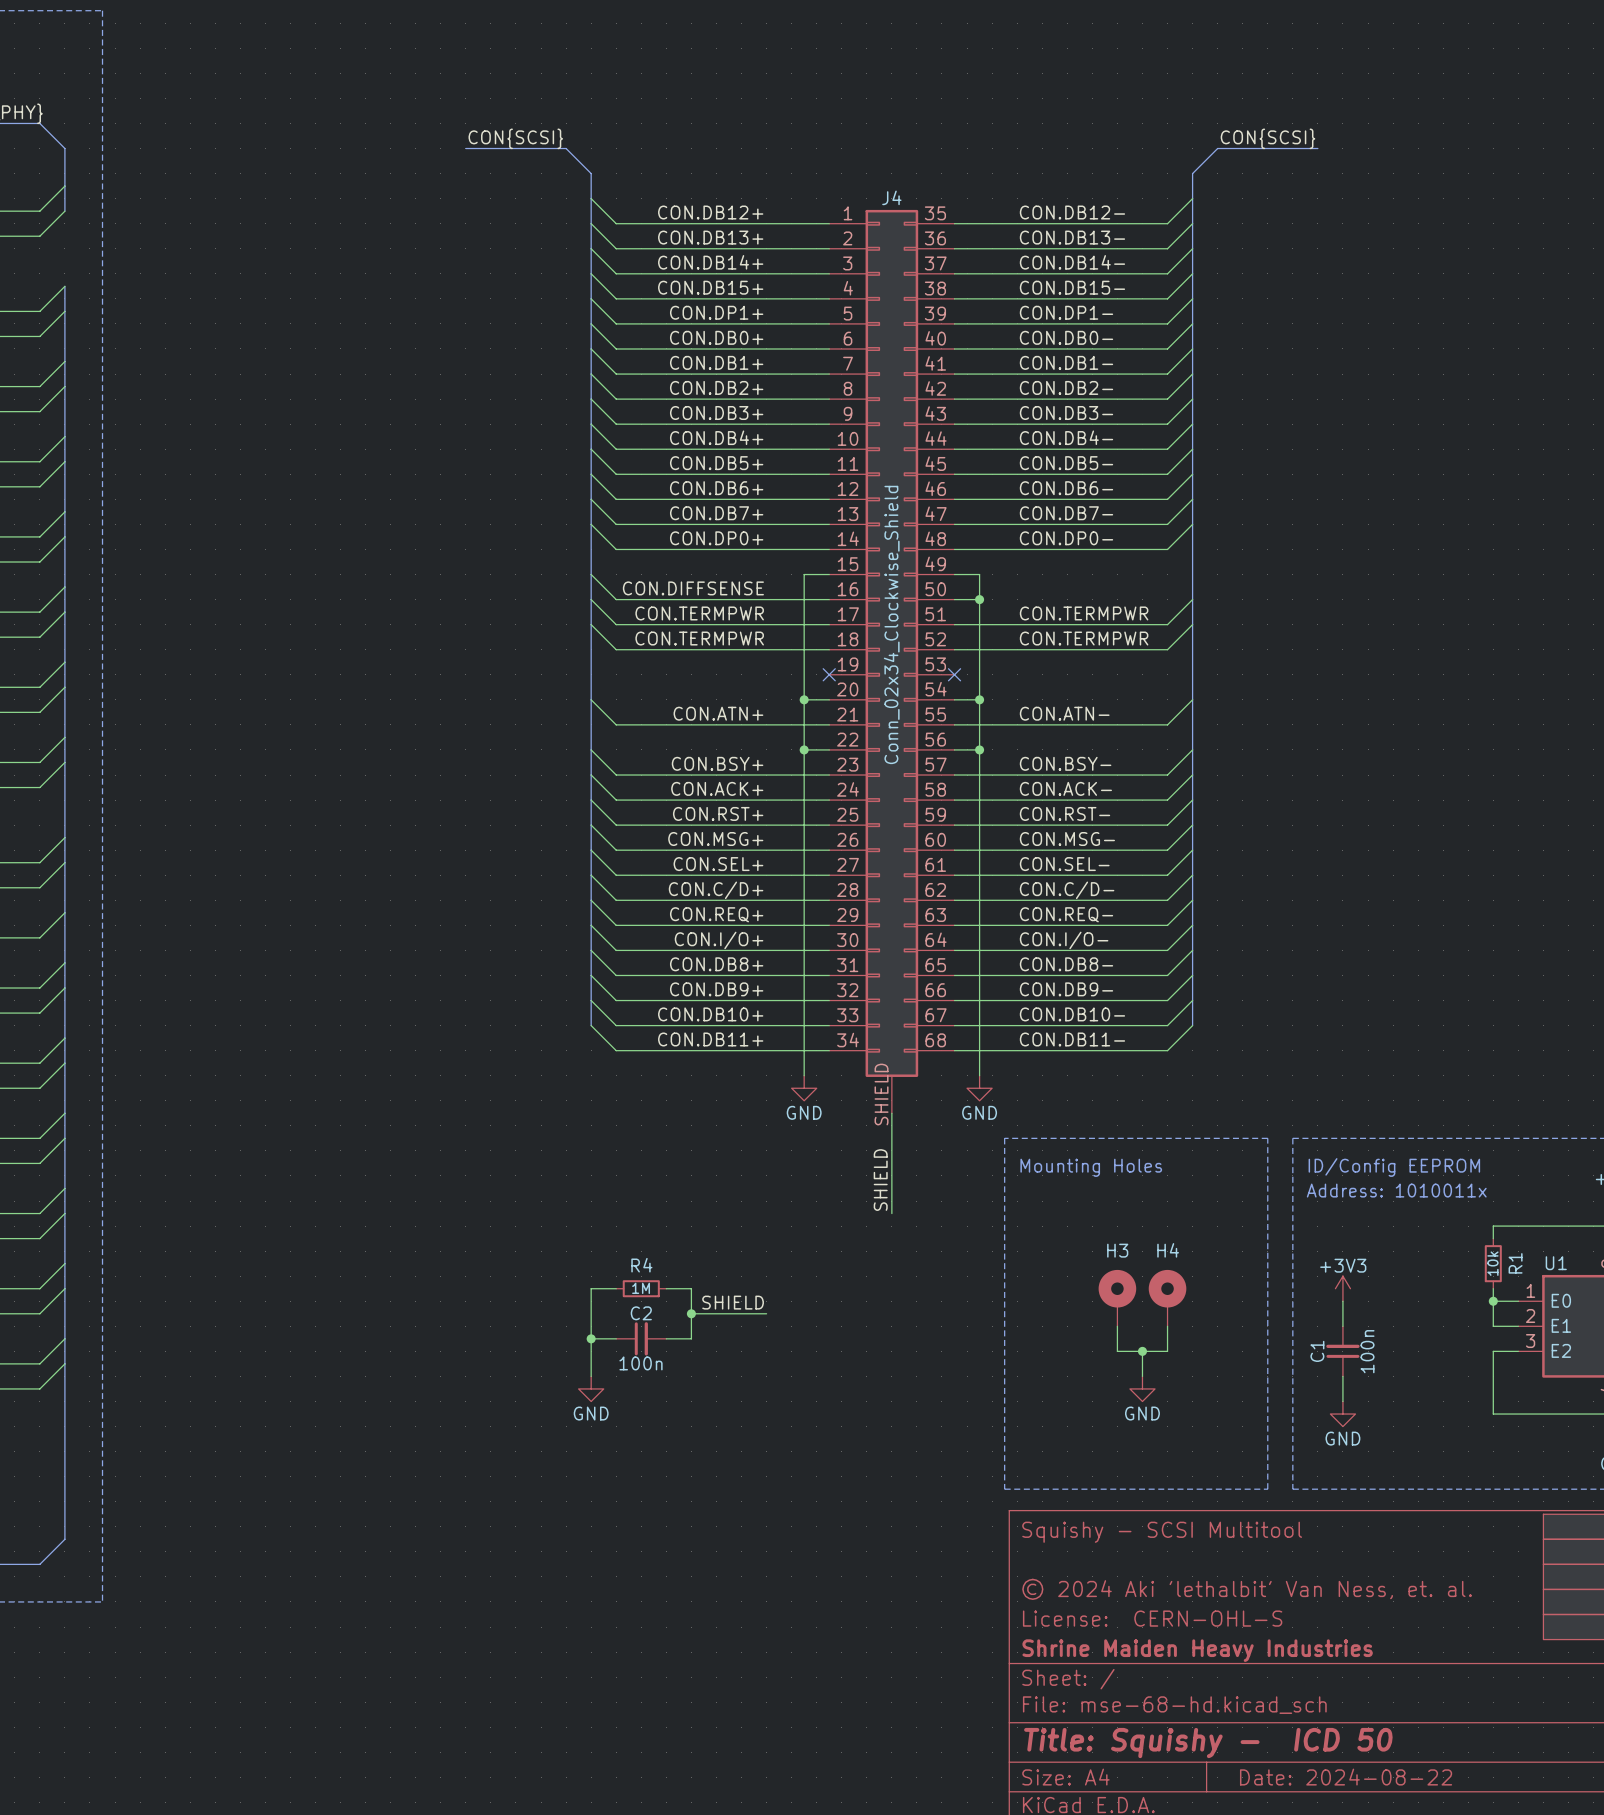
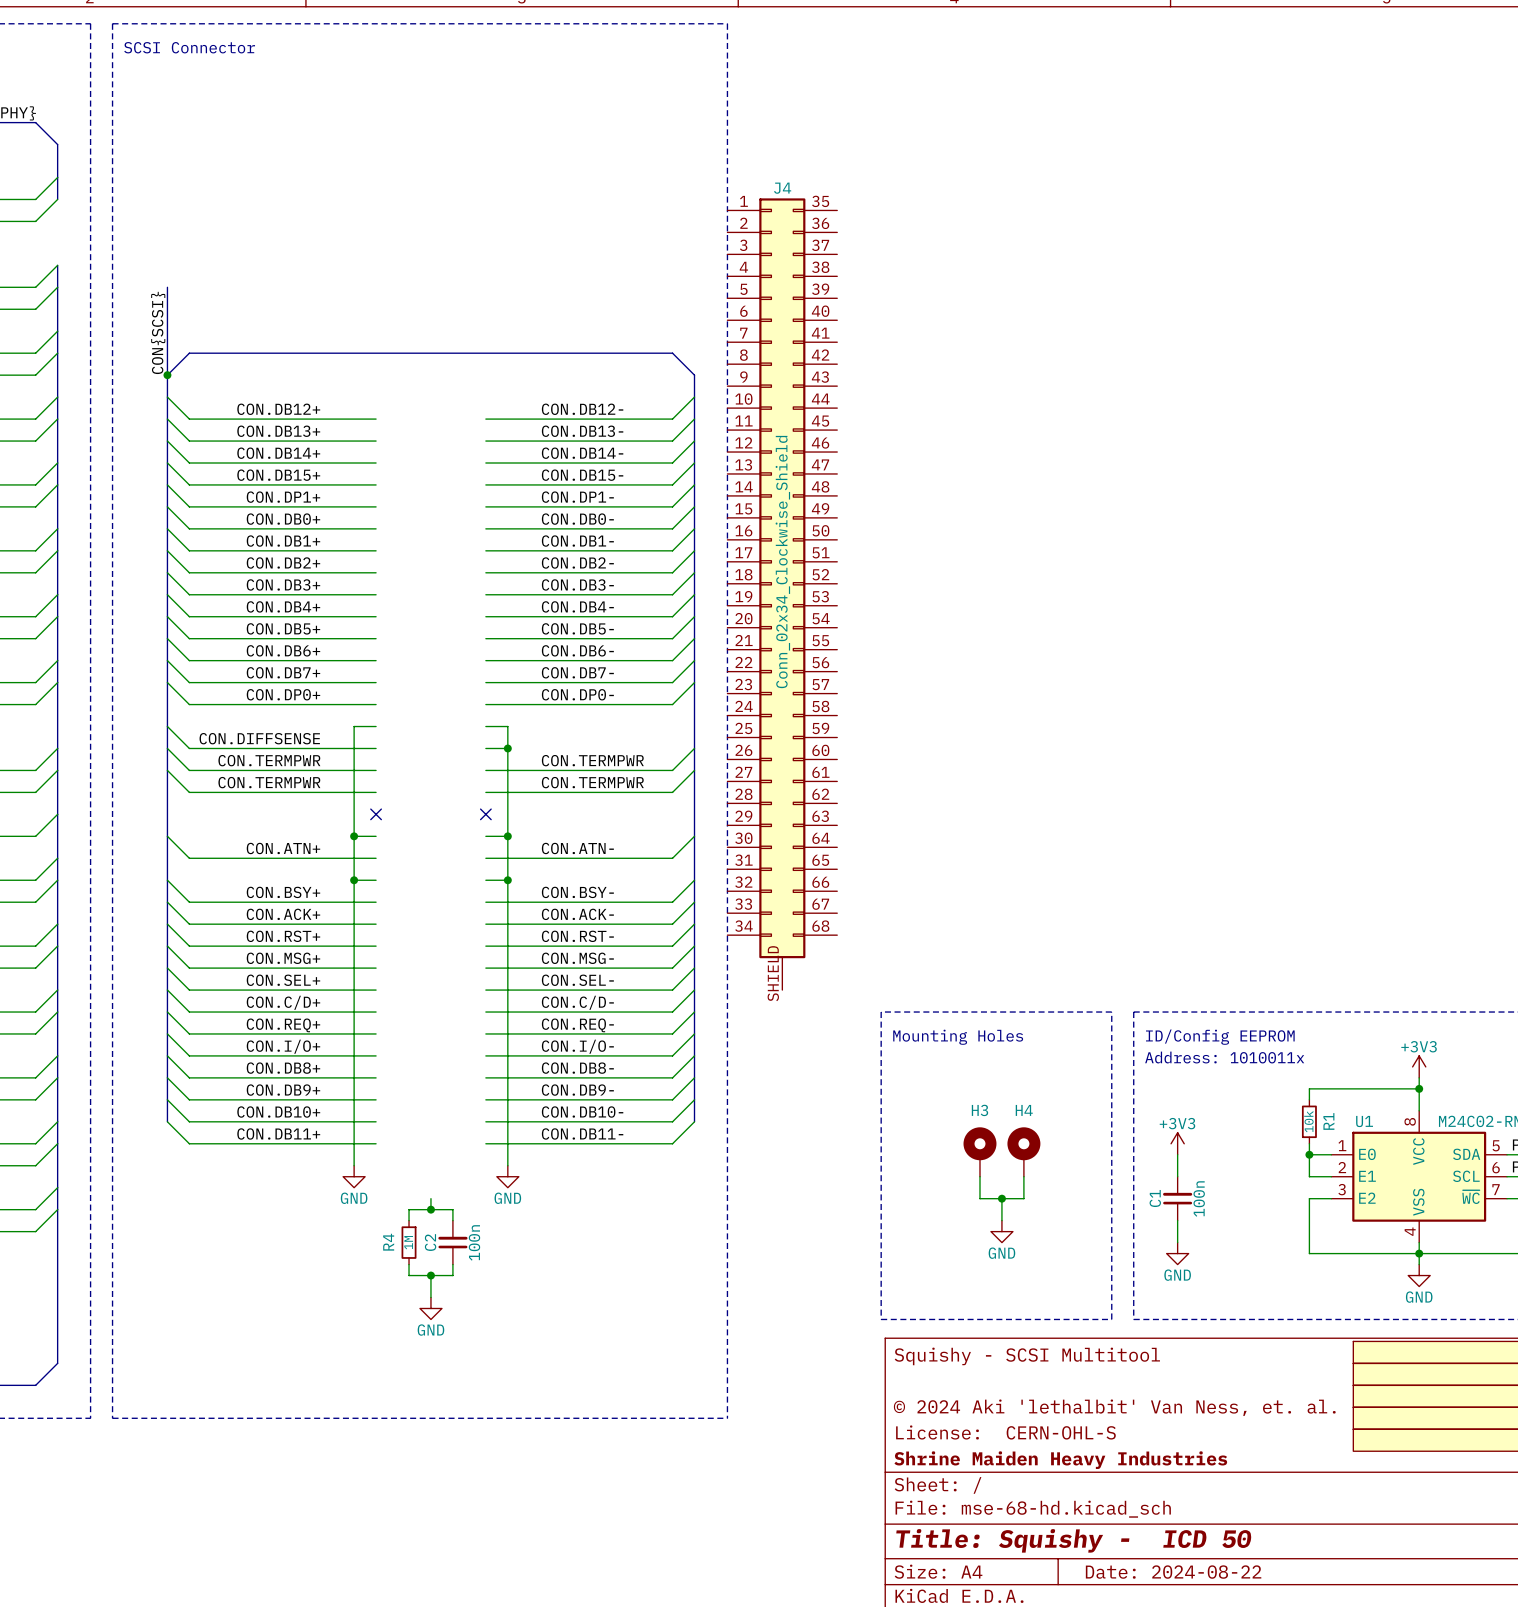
line: none -> (112, 23) (112, 1418) (727, 1418) (727, 23) (112, 23)
text: none -> SCSI Connector (189, 47)
label: CON{SCSI} (515, 138) -> none
label: CON{SCSI} (1267, 138) -> none
bus: (465, 148) (566, 148) (591, 173) (591, 1025) -> none
bus: (1317, 148) (1217, 148) (1192, 173) (1192, 1025) -> none
wire: (591, 198) (616, 223) (829, 223) -> none
wire: (1192, 198) (1167, 223) (954, 223) -> none
label: CON.DB12+ (710, 212) -> none
label: CON.DB12- (1072, 212) -> none
wire: (591, 223) (616, 248) (829, 248) -> none
wire: (1192, 223) (1167, 248) (954, 248) -> none
label: CON.DB13+ (710, 237) -> none
label: CON.DB13- (1072, 237) -> none
wire: (591, 248) (616, 273) (829, 273) -> none
wire: (1192, 248) (1167, 273) (954, 273) -> none
label: CON.DB14+ (710, 262) -> none
label: CON.DB14- (1072, 262) -> none
wire: (591, 273) (616, 298) (829, 298) -> none
wire: (1192, 273) (1167, 298) (954, 298) -> none
label: CON.DB15+ (710, 287) -> none
label: CON.DB15- (1072, 287) -> none
wire: (591, 298) (616, 323) (829, 323) -> none
wire: (1192, 298) (1167, 323) (954, 323) -> none
bus: none -> (167, 287) (167, 1121)
label: CON.DP1+ (716, 312) -> none
label: CON.DP1- (1066, 312) -> none
wire: (591, 323) (616, 348) (829, 348) -> none
wire: (1192, 323) (1167, 348) (954, 348) -> none
label: CON.DB0+ (716, 337) -> none
label: CON.DB0- (1066, 337) -> none
wire: (591, 348) (616, 374) (829, 374) -> none
wire: (1192, 348) (1167, 374) (954, 374) -> none
label: none -> CON{SCSI} (158, 332)
label: CON.DB1+ (716, 362) -> none
label: CON.DB1- (1066, 362) -> none
wire: (591, 374) (616, 399) (829, 399) -> none
wire: (1192, 374) (1167, 399) (954, 399) -> none
label: CON.DB2+ (716, 387) -> none
label: CON.DB2- (1066, 387) -> none
wire: (591, 399) (616, 424) (829, 424) -> none
wire: (1192, 399) (1167, 424) (954, 424) -> none
bus: none -> (167, 375) (189, 353) (672, 353) (694, 375) (694, 1121)
junction: none -> (167, 375)
label: CON.DB3+ (716, 412) -> none
label: CON.DB3- (1066, 412) -> none
wire: (591, 424) (616, 449) (829, 449) -> none
wire: (1192, 424) (1167, 449) (954, 449) -> none
wire: none -> (167, 397) (189, 419) (376, 419)
wire: none -> (694, 397) (672, 419) (485, 419)
label: CON.DB4+ (716, 437) -> none
label: CON.DB4- (1066, 437) -> none
wire: (591, 449) (616, 474) (829, 474) -> none
wire: (1192, 449) (1167, 474) (954, 474) -> none
label: none -> CON.DB12+ (278, 409)
label: none -> CON.DB12- (582, 409)
wire: none -> (167, 419) (189, 441) (376, 441)
wire: none -> (694, 419) (672, 441) (485, 441)
label: CON.DB5+ (716, 463) -> none
label: CON.DB5- (1066, 463) -> none
wire: (591, 474) (616, 499) (829, 499) -> none
wire: (1192, 474) (1167, 499) (954, 499) -> none
label: none -> CON.DB13+ (278, 431)
label: none -> CON.DB13- (582, 431)
wire: none -> (167, 441) (189, 462) (376, 462)
wire: none -> (694, 441) (672, 462) (485, 462)
label: CON.DB6+ (716, 488) -> none
label: CON.DB6- (1066, 488) -> none
wire: (591, 499) (616, 524) (829, 524) -> none
wire: (1192, 499) (1167, 524) (954, 524) -> none
label: none -> CON.DB14+ (278, 453)
label: none -> CON.DB14- (582, 453)
wire: none -> (167, 462) (189, 484) (376, 484)
wire: none -> (694, 462) (672, 484) (485, 484)
label: CON.DB7+ (716, 513) -> none
label: CON.DB7- (1066, 513) -> none
wire: (591, 524) (616, 549) (829, 549) -> none
wire: (1192, 524) (1167, 549) (954, 549) -> none
label: none -> CON.DB15+ (278, 475)
label: none -> CON.DB15- (582, 475)
wire: none -> (167, 484) (189, 506) (376, 506)
wire: none -> (694, 484) (672, 506) (485, 506)
label: CON.DP0+ (716, 538) -> CON.DP1- (577, 497)
label: CON.DP0- (1066, 538) -> none
label: none -> CON.DP1+ (283, 497)
wire: none -> (167, 506) (189, 528) (376, 528)
wire: none -> (694, 506) (672, 528) (485, 528)
wire: (591, 574) (616, 599) (829, 599) -> none
wire: (829, 574) (804, 574) (804, 1075) -> none
wire: (954, 574) (979, 574) (979, 1075) -> none
label: none -> CON.DB0+ (283, 519)
label: none -> CON.DB0- (577, 519)
wire: none -> (167, 528) (189, 550) (376, 550)
wire: none -> (694, 528) (672, 550) (485, 550)
label: CON.DIFFSENSE (693, 588) -> none
wire: (591, 599) (616, 624) (829, 624) -> none
wire: (954, 599) (979, 599) -> none
junction: (979, 599) -> none
wire: (1192, 599) (1167, 624) (954, 624) -> none
label: none -> CON.DB1+ (283, 541)
label: none -> CON.DB1- (577, 541)
wire: none -> (167, 550) (189, 572) (376, 572)
wire: none -> (694, 550) (672, 572) (485, 572)
label: CON.TERMPWR (699, 613) -> none
label: CON.TERMPWR (1084, 613) -> none
wire: (591, 624) (616, 649) (829, 649) -> none
wire: (1192, 624) (1167, 649) (954, 649) -> none
label: none -> CON.DB2+ (283, 563)
label: none -> CON.DB2- (577, 563)
wire: none -> (167, 572) (189, 594) (376, 594)
wire: none -> (694, 572) (672, 594) (485, 594)
label: CON.TERMPWR (699, 638) -> none
label: CON.TERMPWR (1084, 638) -> none
label: none -> CON.DB3+ (283, 584)
label: none -> CON.DB3- (577, 584)
wire: none -> (167, 594) (189, 616) (376, 616)
wire: none -> (694, 594) (672, 616) (485, 616)
no-connect mark: (829, 674) -> none
no-connect mark: (954, 674) -> none
label: none -> CON.DB4+ (283, 606)
label: none -> CON.DB4- (577, 606)
wire: none -> (167, 616) (189, 638) (376, 638)
wire: none -> (694, 616) (672, 638) (485, 638)
wire: (591, 699) (616, 724) (829, 724) -> none
wire: (804, 699) (829, 699) -> none
junction: (804, 699) -> none
wire: (954, 699) (979, 699) -> none
junction: (979, 699) -> none
wire: (1192, 699) (1167, 724) (954, 724) -> none
label: none -> CON.DB5+ (283, 628)
label: none -> CON.DB5- (577, 628)
wire: none -> (167, 638) (189, 660) (376, 660)
wire: none -> (694, 638) (672, 660) (485, 660)
label: CON.ATN+ (718, 713) -> none
label: CON.ATN- (1064, 713) -> none
label: none -> CON.DB6+ (283, 650)
label: none -> CON.DB6- (577, 650)
wire: none -> (167, 660) (189, 682) (376, 682)
wire: none -> (694, 660) (672, 682) (485, 682)
wire: (591, 749) (616, 775) (829, 775) -> none
wire: (804, 749) (829, 749) -> none
junction: (804, 749) -> none
wire: (954, 749) (979, 749) -> none
junction: (979, 749) -> none
wire: (1192, 749) (1167, 775) (954, 775) -> none
label: none -> CON.DB7+ (283, 672)
wire: none -> (167, 682) (189, 704) (376, 704)
wire: none -> (694, 682) (672, 704) (485, 704)
label: CON.BSY+ (717, 763) -> CON.DB7- (577, 672)
label: CON.BSY- (1065, 763) -> none
wire: (591, 775) (616, 800) (829, 800) -> none
wire: (1192, 775) (1167, 800) (954, 800) -> none
label: none -> CON.DP0+ (283, 694)
label: none -> CON.DP0- (577, 694)
label: CON.ACK+ (717, 788) -> none
label: CON.ACK- (1065, 788) -> none
wire: (591, 800) (616, 825) (829, 825) -> none
wire: (1192, 800) (1167, 825) (954, 825) -> none
wire: none -> (167, 726) (189, 748) (376, 748)
wire: none -> (376, 726) (354, 726) (354, 1165)
wire: none -> (485, 726) (507, 726) (507, 1165)
label: CON.RST+ (718, 813) -> none
label: CON.RST- (1065, 813) -> none
wire: (591, 825) (616, 850) (829, 850) -> none
wire: (1192, 825) (1167, 850) (954, 850) -> none
label: none -> CON.DIFFSENSE (259, 738)
wire: none -> (167, 748) (189, 770) (376, 770)
wire: none -> (485, 748) (507, 748)
junction: none -> (507, 748)
wire: none -> (694, 748) (672, 770) (485, 770)
label: CON.MSG+ (715, 839) -> none
label: CON.MSG- (1067, 839) -> none
wire: (591, 850) (616, 875) (829, 875) -> none
wire: (1192, 850) (1167, 875) (954, 875) -> none
label: none -> CON.TERMPWR (269, 760)
label: none -> CON.TERMPWR (592, 760)
wire: none -> (167, 770) (189, 792) (376, 792)
wire: none -> (694, 770) (672, 792) (485, 792)
label: CON.SEL+ (718, 864) -> none
label: CON.SEL- (1064, 864) -> none
wire: (591, 875) (616, 900) (829, 900) -> none
wire: (1192, 875) (1167, 900) (954, 900) -> none
label: none -> CON.TERMPWR (269, 782)
label: none -> CON.TERMPWR (592, 782)
label: CON.C/D+ (716, 890) -> none
label: CON.C/D- (1067, 890) -> none
wire: (591, 900) (616, 925) (829, 925) -> none
wire: (1192, 900) (1167, 925) (954, 925) -> none
no-connect mark: none -> (376, 814)
no-connect mark: none -> (485, 814)
label: CON.REQ+ (716, 914) -> none
label: CON.REQ- (1066, 914) -> none
wire: (591, 925) (616, 950) (829, 950) -> none
wire: (1192, 925) (1167, 950) (954, 950) -> none
wire: none -> (167, 836) (189, 858) (376, 858)
wire: none -> (354, 836) (376, 836)
junction: none -> (354, 836)
wire: none -> (485, 836) (507, 836)
junction: none -> (507, 836)
wire: none -> (694, 836) (672, 858) (485, 858)
label: CON.I/O+ (719, 940) -> none
label: CON.I/O- (1064, 940) -> none
wire: (591, 950) (616, 975) (829, 975) -> none
wire: (1192, 950) (1167, 975) (954, 975) -> none
label: none -> CON.ATN+ (283, 848)
label: none -> CON.ATN- (577, 848)
label: CON.DB8+ (716, 964) -> none
label: CON.DB8- (1066, 964) -> none
wire: (591, 975) (616, 1000) (829, 1000) -> none
wire: (1192, 975) (1167, 1000) (954, 1000) -> none
wire: none -> (167, 880) (189, 902) (376, 902)
wire: none -> (354, 880) (376, 880)
junction: none -> (354, 880)
wire: none -> (485, 880) (507, 880)
junction: none -> (507, 880)
wire: none -> (694, 880) (672, 902) (485, 902)
label: CON.DB9+ (716, 989) -> CON.BSY- (577, 892)
label: CON.DB9- (1066, 989) -> none
wire: (591, 1000) (616, 1025) (829, 1025) -> none
wire: (1192, 1000) (1167, 1025) (954, 1025) -> none
label: none -> CON.BSY+ (283, 892)
wire: none -> (167, 902) (189, 924) (376, 924)
wire: none -> (694, 902) (672, 924) (485, 924)
label: CON.DB10+ (710, 1014) -> none
label: CON.DB10- (1072, 1014) -> none
wire: (591, 1025) (616, 1050) (829, 1050) -> none
wire: (1192, 1025) (1167, 1050) (954, 1050) -> none
label: none -> CON.ACK+ (283, 914)
label: none -> CON.ACK- (577, 914)
wire: none -> (167, 924) (189, 946) (376, 946)
wire: none -> (694, 924) (672, 946) (485, 946)
label: CON.DB11+ (710, 1039) -> none
label: CON.DB11- (1072, 1039) -> none
label: none -> CON.RST+ (283, 936)
label: none -> CON.RST- (577, 936)
wire: none -> (167, 946) (189, 968) (376, 968)
wire: none -> (694, 946) (672, 968) (485, 968)
label: none -> CON.MSG+ (283, 958)
label: none -> CON.MSG- (577, 958)
wire: none -> (167, 968) (189, 990) (376, 990)
wire: none -> (694, 968) (672, 990) (485, 990)
power symbol: GND (804, 1088) -> none
power symbol: GND (979, 1088) -> none
label: none -> CON.SEL+ (283, 980)
label: none -> CON.SEL- (577, 980)
wire: none -> (167, 990) (189, 1012) (376, 1012)
wire: none -> (694, 990) (672, 1012) (485, 1012)
wire: (891, 1113) (891, 1213) -> none
label: none -> CON.C/D+ (283, 1002)
label: none -> CON.C/D- (577, 1002)
wire: none -> (167, 1012) (189, 1033) (376, 1033)
wire: none -> (694, 1012) (672, 1033) (485, 1033)
label: none -> CON.REQ+ (283, 1025)
label: none -> CON.REQ- (577, 1025)
wire: none -> (167, 1033) (189, 1055) (376, 1055)
wire: none -> (694, 1033) (672, 1055) (485, 1055)
label: none -> CON.I/O+ (283, 1046)
label: none -> CON.I/O- (577, 1046)
label: SHIELD (880, 1180) -> none
wire: none -> (167, 1055) (189, 1077) (376, 1077)
wire: none -> (694, 1055) (672, 1077) (485, 1077)
label: none -> CON.DB8+ (283, 1068)
label: none -> CON.DB8- (577, 1068)
wire: none -> (167, 1077) (189, 1099) (376, 1099)
wire: none -> (694, 1077) (672, 1099) (485, 1099)
label: none -> CON.DB9+ (283, 1090)
label: none -> CON.DB9- (577, 1090)
wire: none -> (167, 1099) (189, 1121) (376, 1121)
wire: none -> (694, 1099) (672, 1121) (485, 1121)
label: none -> CON.DB10+ (278, 1112)
label: none -> CON.DB10- (582, 1112)
wire: none -> (167, 1121) (189, 1143) (376, 1143)
R4 name position: R4 (641, 1265) -> R4 (388, 1242)
label: none -> CON.DB11+ (278, 1133)
label: none -> CON.DB11- (582, 1133)
wire: (591, 1288) (591, 1376) -> (518, 1143) (485, 1143)
wire: none -> (540, 1143) (584, 1143)
R4 rotation: 0° (641, 1288) -> 90° clockwise (409, 1242)
R4 position: (641, 1288) -> (409, 1242)
wire: (691, 1288) (691, 1338) (666, 1338) -> (606, 1143) (672, 1143) (694, 1121)
label: SHIELD (733, 1302) -> none
wire: (691, 1313) (766, 1313) -> none
junction: (691, 1313) -> none
power symbol: none -> GND (354, 1176)
wire: (591, 1338) (616, 1338) -> none
junction: (591, 1338) -> none
C2 rotation: 0° (641, 1338) -> 90° counterclockwise (452, 1242)
C2 position: (641, 1338) -> (452, 1242)
wire: none -> (430, 1198) (430, 1209)
junction: none -> (430, 1209)
wire: none -> (409, 1220) (409, 1209) (452, 1209) (452, 1220)
power symbol position: GND (591, 1388) -> GND (507, 1176)
wire: none -> (409, 1264) (409, 1275) (452, 1275) (452, 1264)
wire: none -> (430, 1275) (430, 1297)
junction: none -> (430, 1275)
power symbol: none -> GND (430, 1308)

